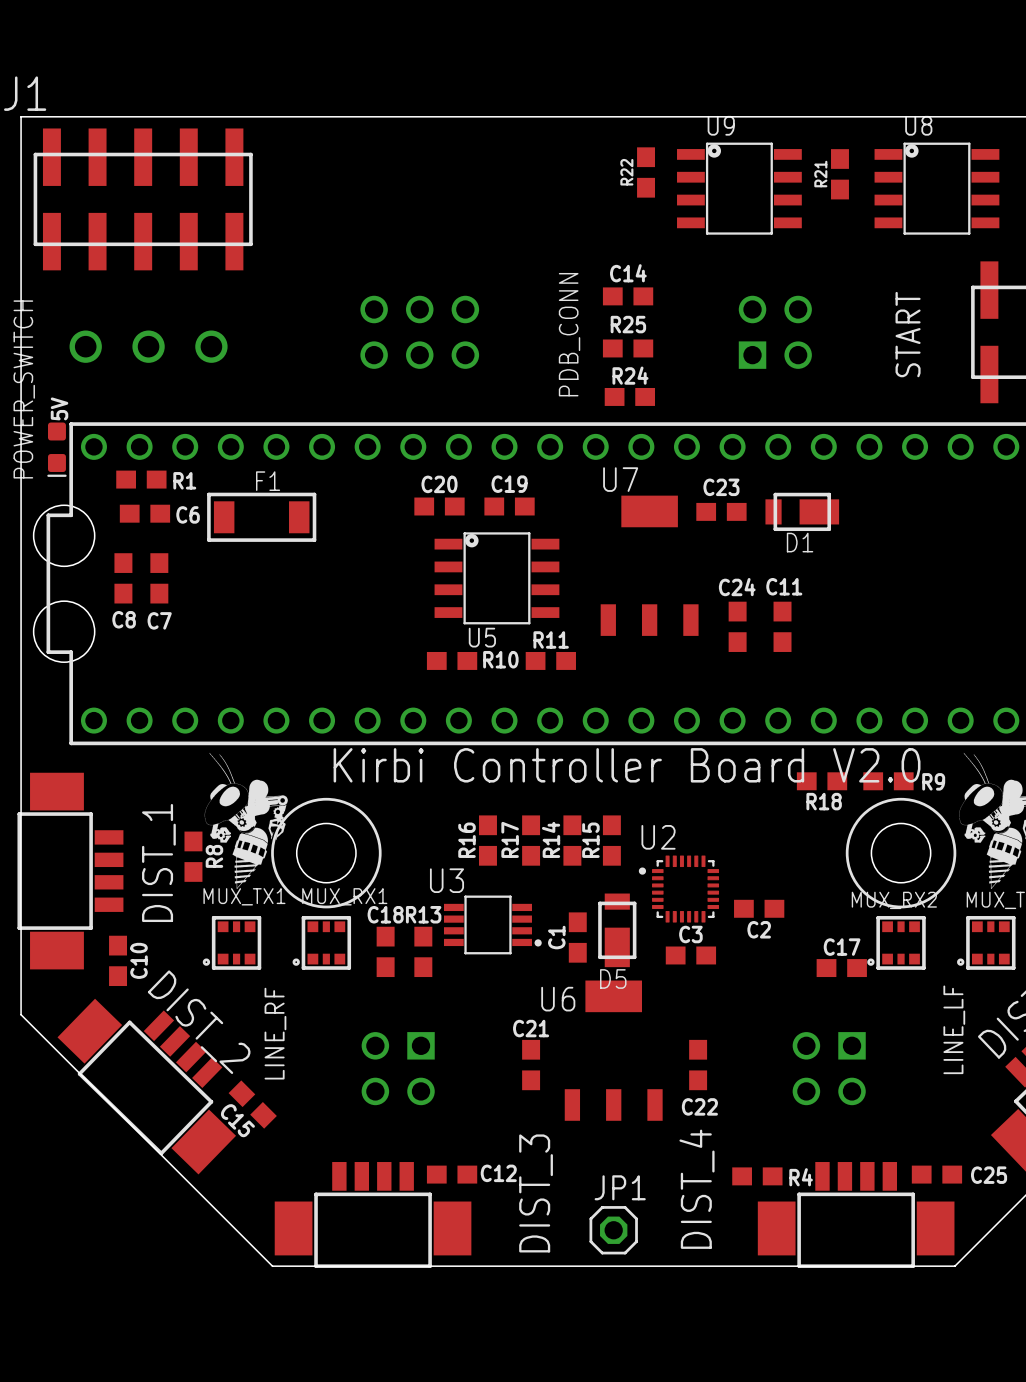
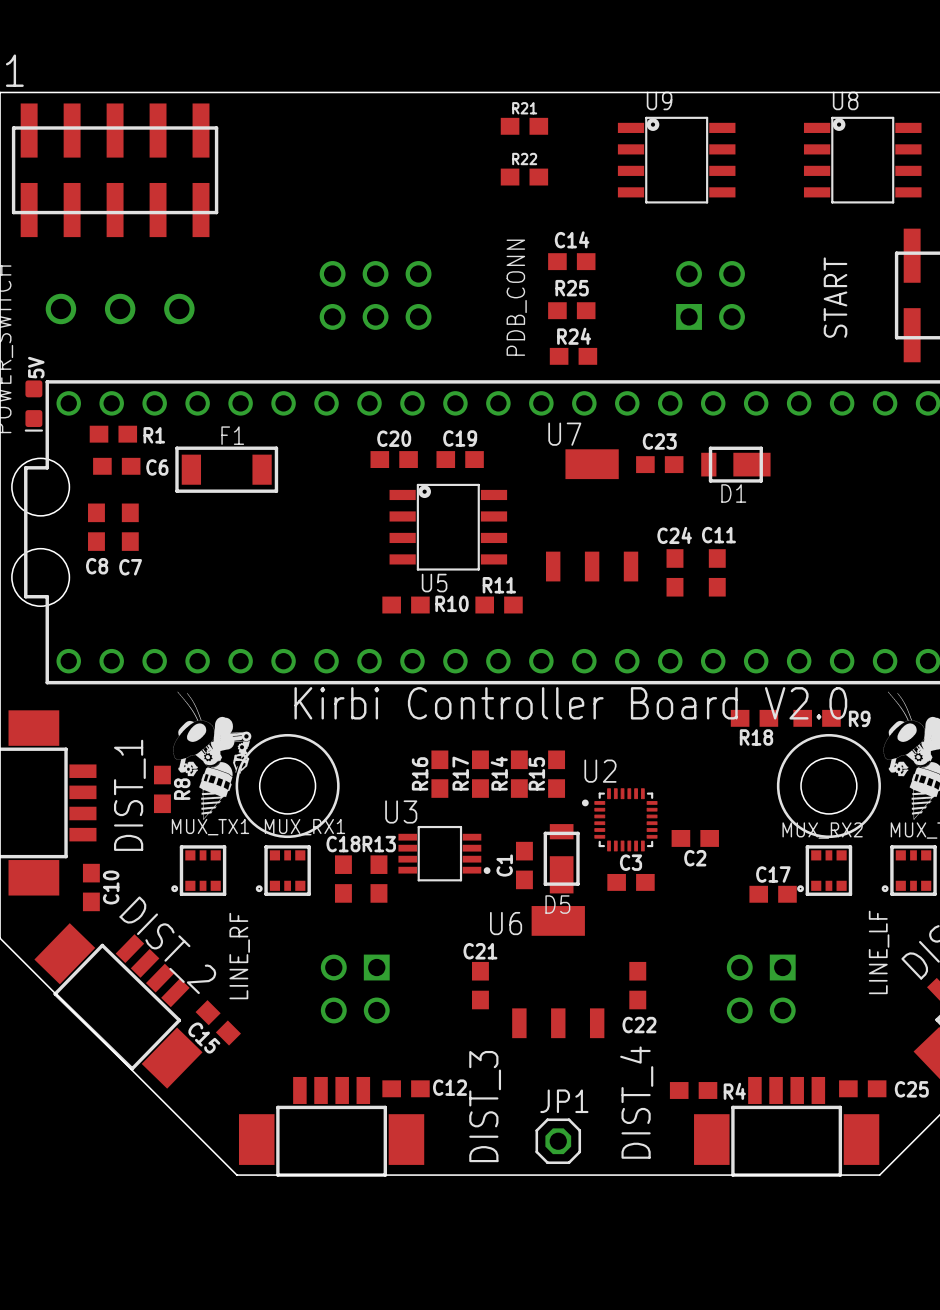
R22 rotation: 0° (646, 172) -> 90° clockwise (524, 177)
R22 position: (646, 172) -> (524, 177)
R21 rotation: 0° (839, 174) -> 90° clockwise (524, 126)
R21 position: (839, 174) -> (524, 126)

